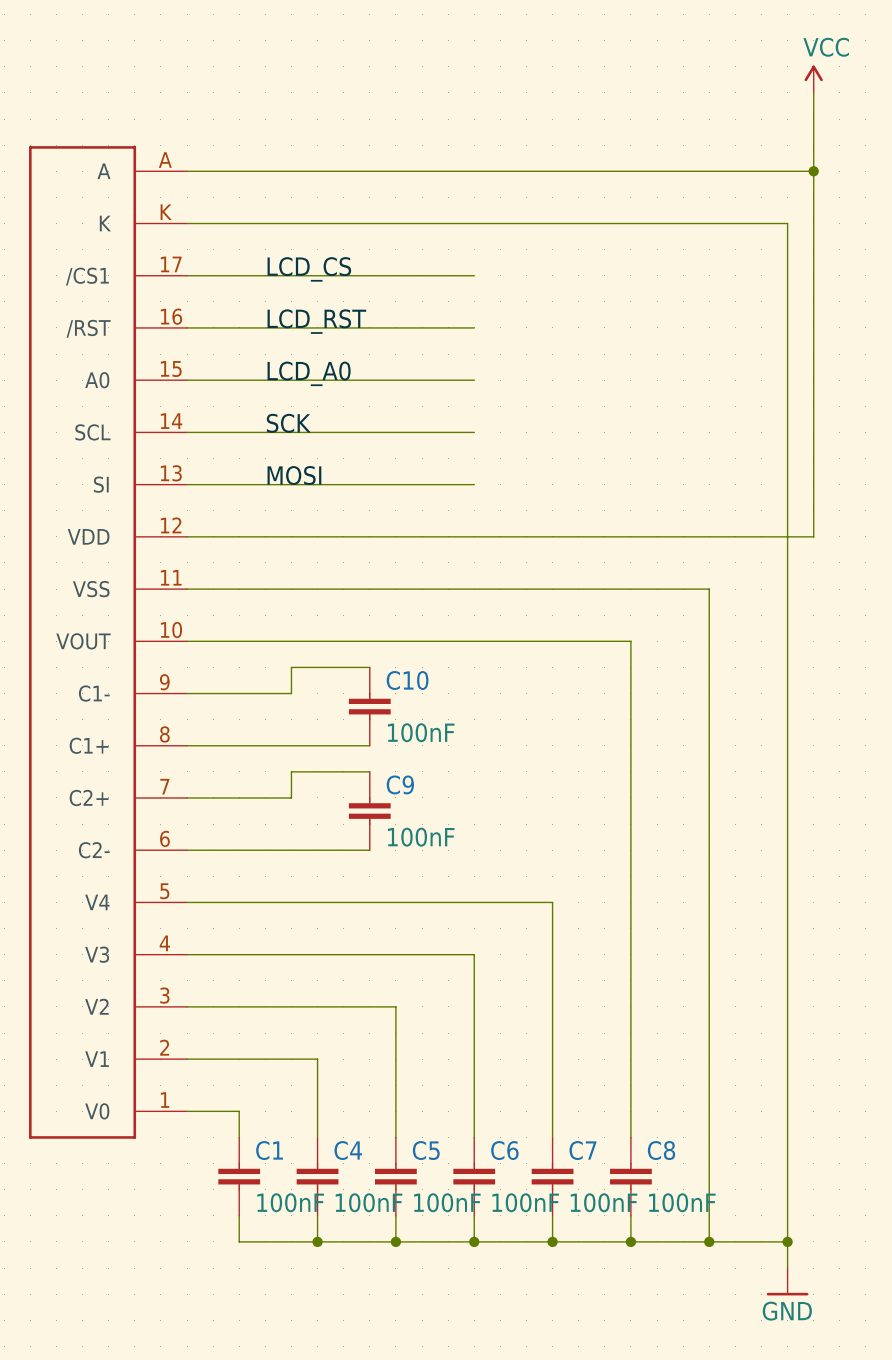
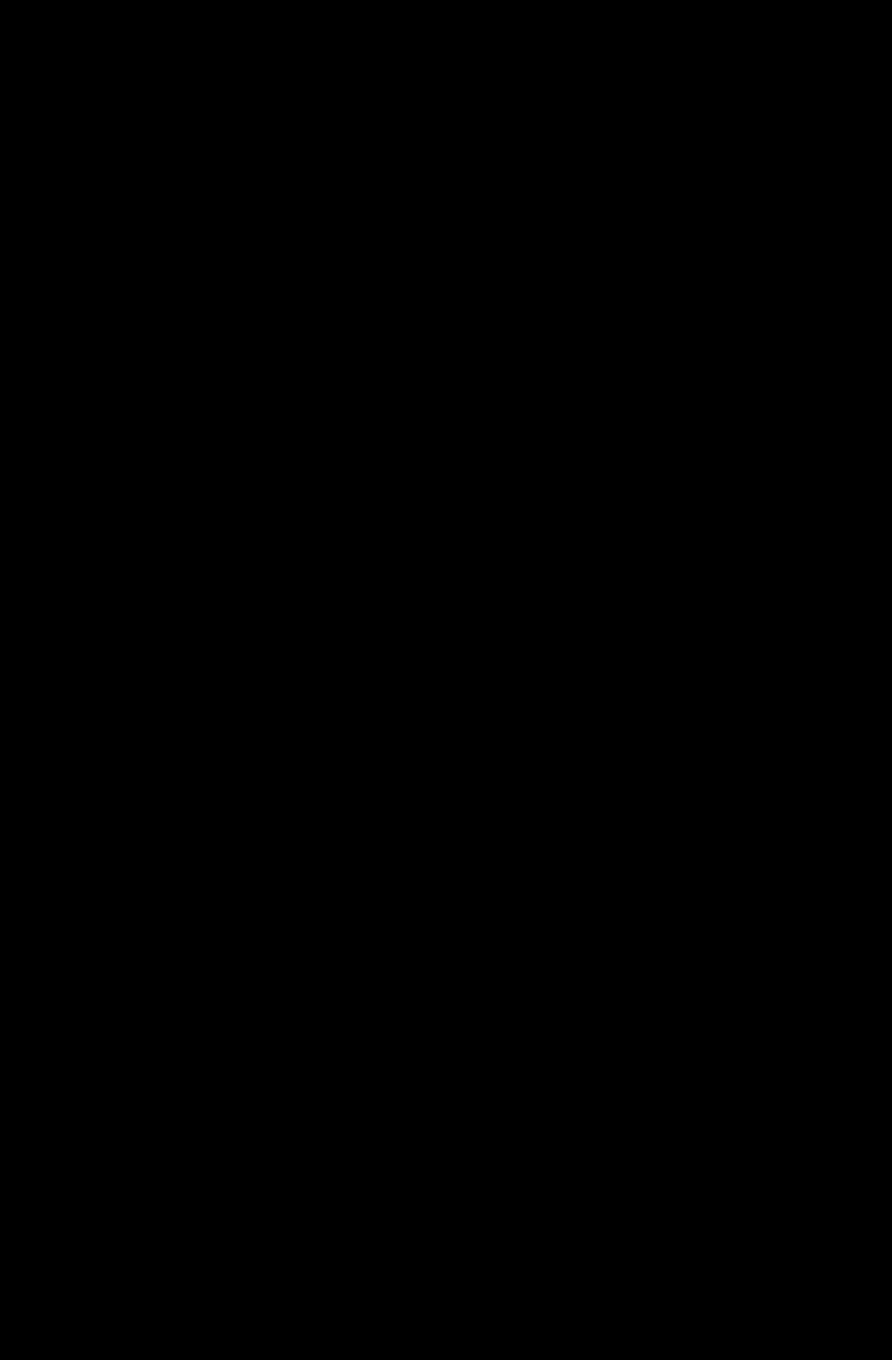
power symbol: VCC (813, 79) -> none
wire: (813, 92) (813, 536) (187, 536) -> none
wire: (187, 171) (813, 171) -> none
junction: (813, 171) -> none
wire: (187, 223) (787, 223) (787, 1268) -> none
label: LCD_CS (309, 269) -> none
wire: (187, 275) (474, 275) -> none
label: LCD_RST (316, 321) -> none
wire: (187, 327) (474, 327) -> none
label: LCD_A0 (309, 373) -> none
wire: (187, 380) (474, 380) -> none
label: SCK (288, 423) -> none
wire: (187, 432) (474, 432) -> none
label: MOSI (294, 475) -> none
wire: (187, 484) (474, 484) -> none
wire: (187, 589) (709, 589) (709, 1241) -> none
wire: (187, 641) (630, 641) (630, 1137) -> none
part: (108, 642) -> none
wire: (369, 667) (291, 667) (291, 693) (187, 693) -> none
C10: 100nF (369, 706) -> none
wire: (187, 745) (369, 745) -> none
wire: (369, 771) (291, 771) (291, 797) (187, 797) -> none
C9: 100nF (369, 811) -> none
wire: (187, 850) (369, 850) -> none
wire: (187, 902) (552, 902) (552, 1137) -> none
wire: (187, 954) (474, 954) (474, 1137) -> none
wire: (187, 1006) (395, 1006) (395, 1137) -> none
wire: (187, 1059) (317, 1059) (317, 1137) -> none
wire: (187, 1111) (239, 1111) (239, 1137) -> none
C1: 100nF (239, 1176) -> none
C4: 100nF (317, 1176) -> none
C5: 100nF (395, 1176) -> none
C6: 100nF (474, 1176) -> none
C7: 100nF (552, 1176) -> none
C8: 100nF (630, 1176) -> none
wire: (239, 1215) (239, 1241) (787, 1241) -> none
wire: (317, 1215) (317, 1241) -> none
wire: (395, 1215) (395, 1241) -> none
wire: (474, 1215) (474, 1241) -> none
wire: (552, 1215) (552, 1241) -> none
wire: (630, 1215) (630, 1241) -> none
junction: (317, 1241) -> none
junction: (395, 1241) -> none
junction: (474, 1241) -> none
junction: (552, 1241) -> none
junction: (630, 1241) -> none
junction: (709, 1241) -> none
junction: (787, 1241) -> none
power symbol: GND (787, 1281) -> none

